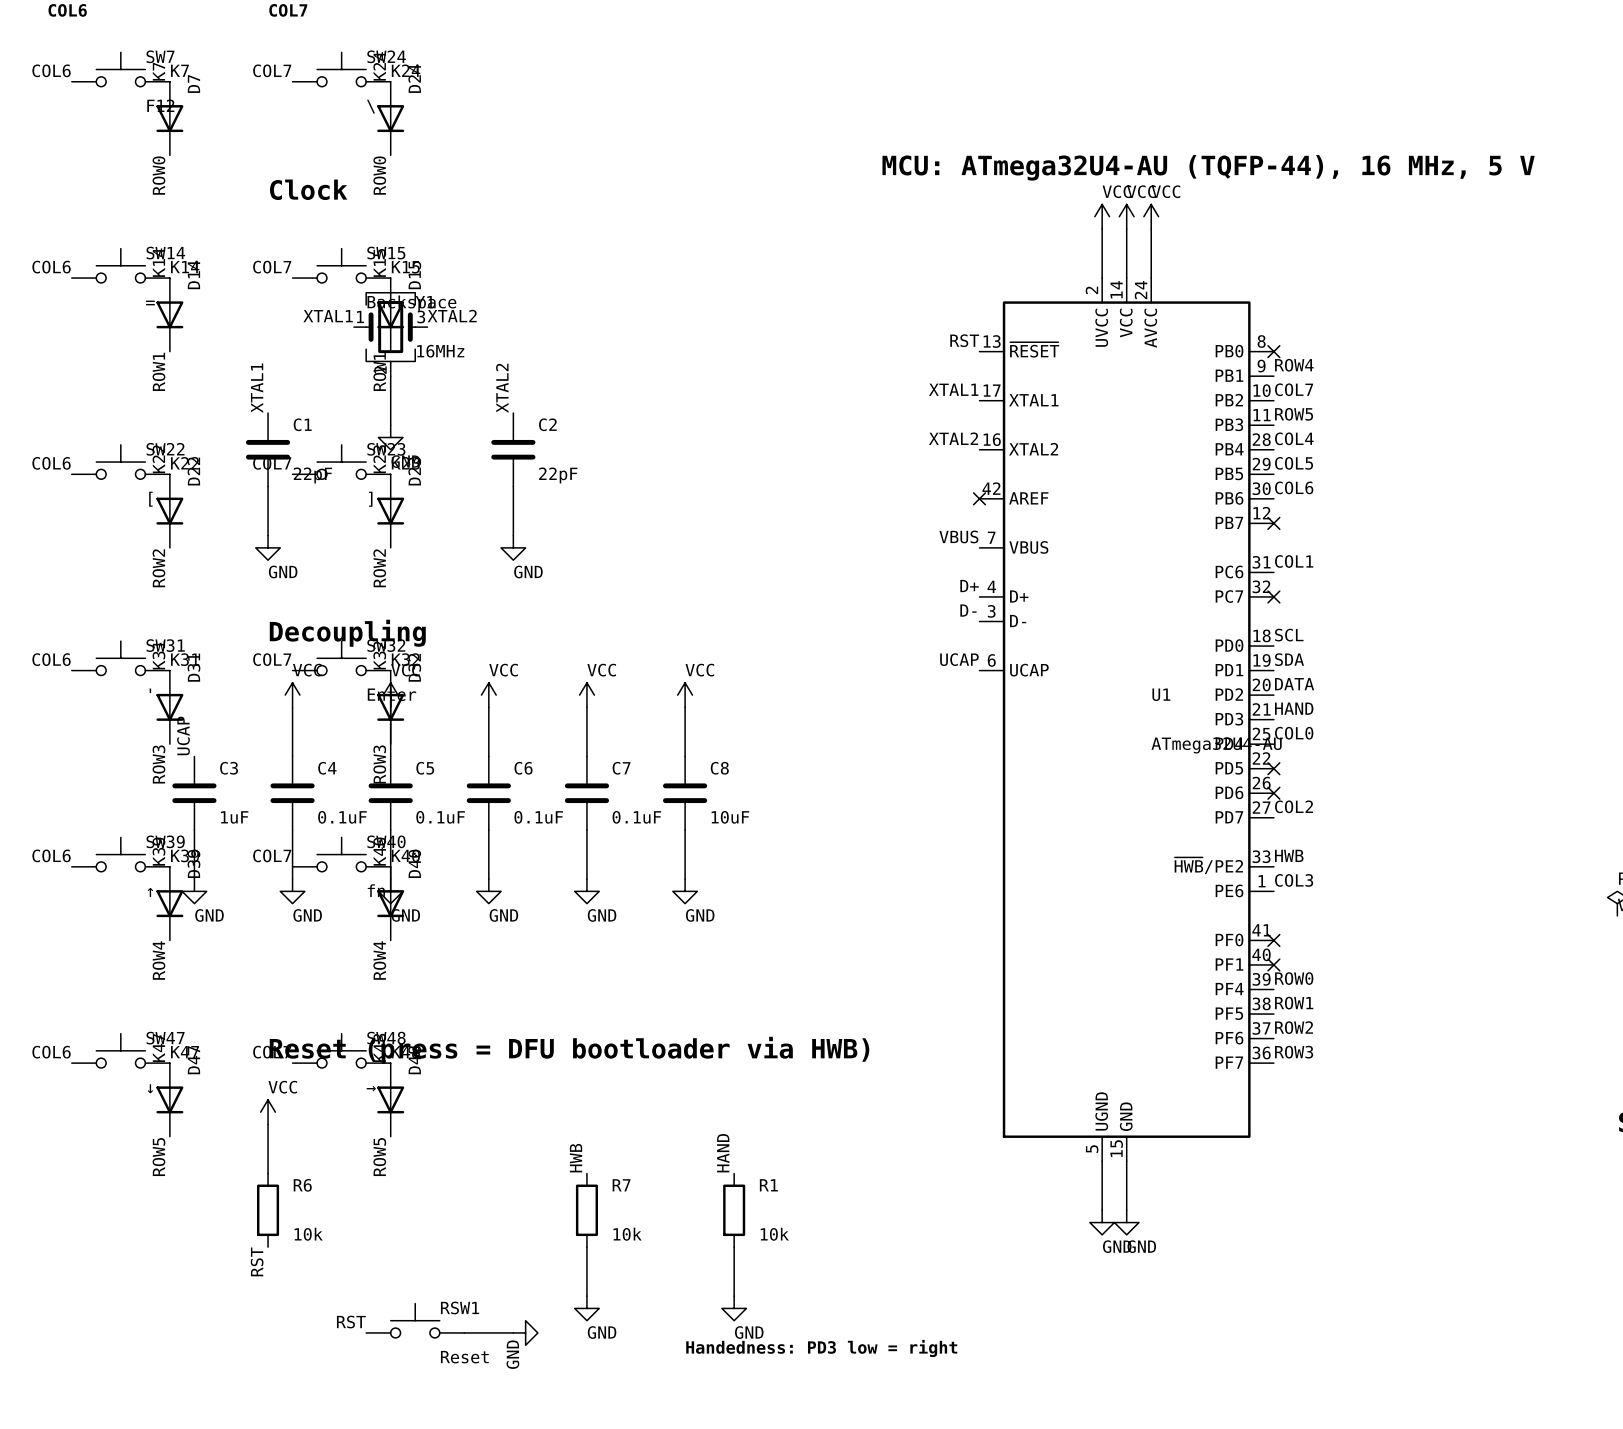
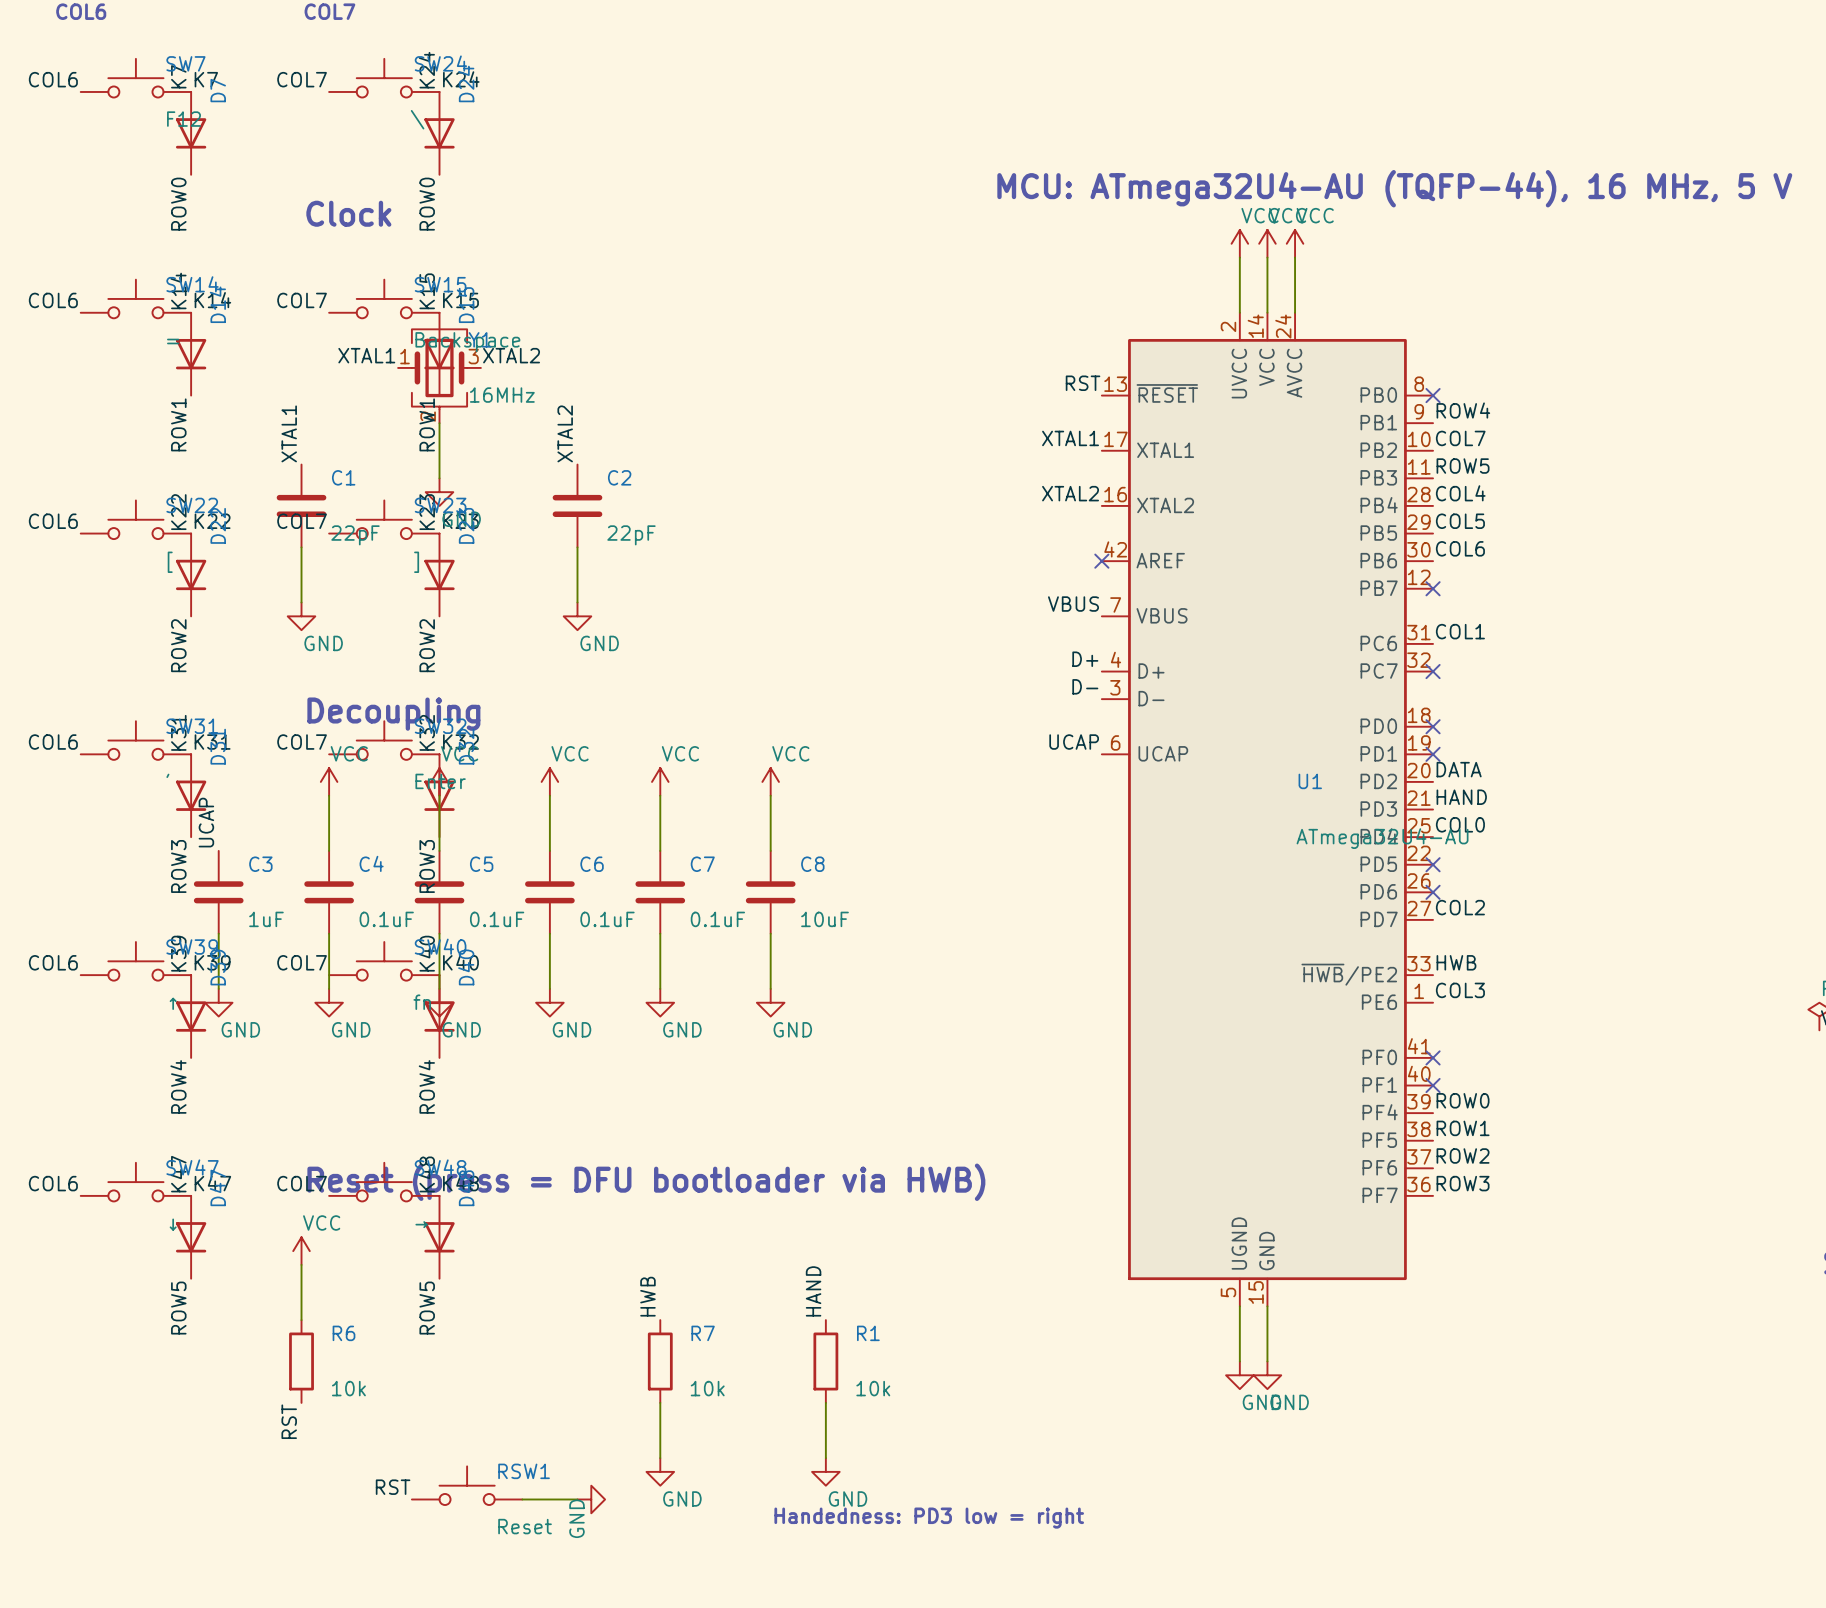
label: SCL (1289, 635) -> none
no-connect mark: none -> (1433, 726)
label: SDA (1289, 659) -> none
no-connect mark: none -> (1433, 754)

